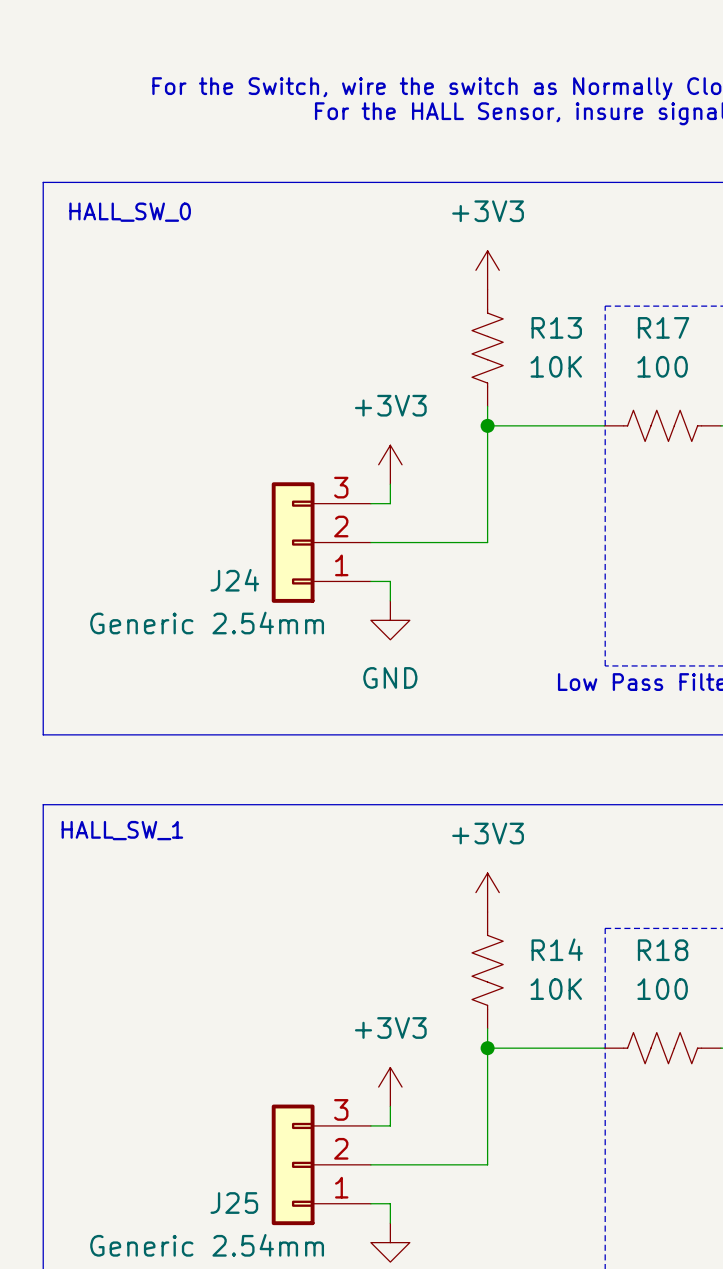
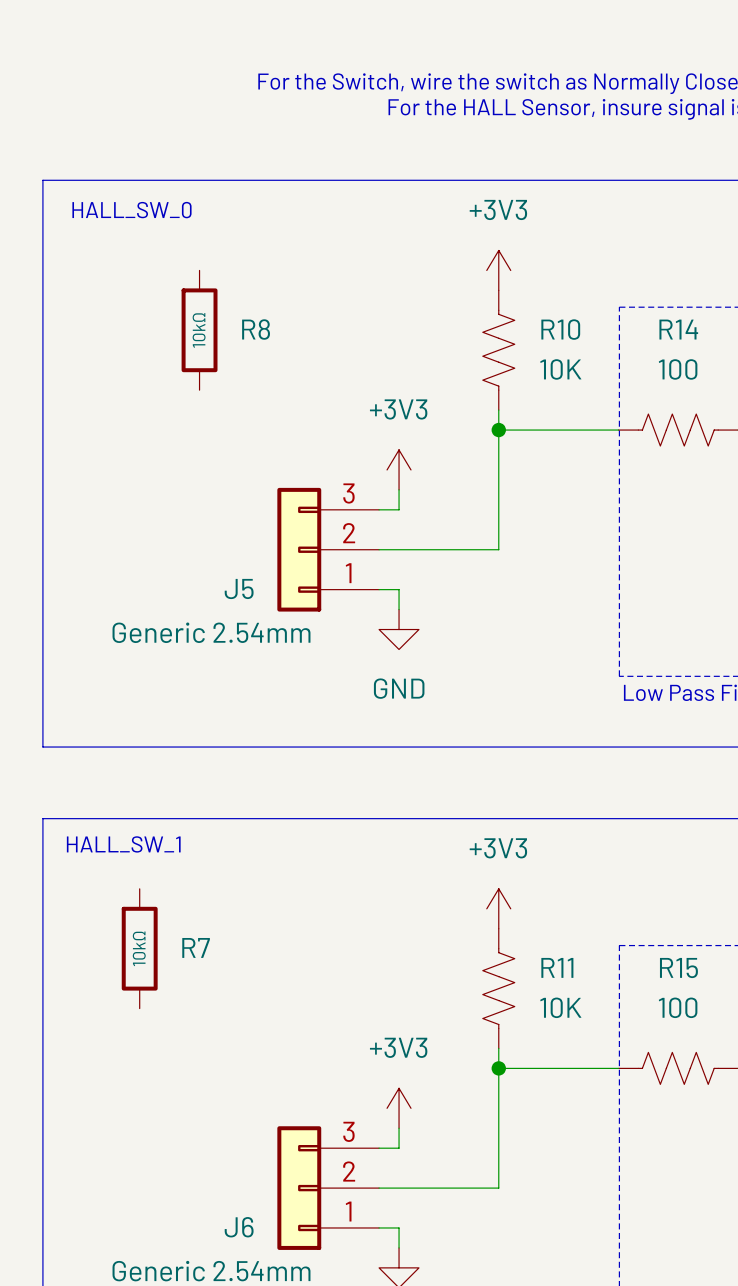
R13 name: R13 (556, 327) -> R10 (560, 329)
R17 name: R17 (663, 327) -> R14 (678, 329)
R8: none -> 10kΩ (199, 330)
J24 name: J24 (234, 580) -> J5 (239, 588)
R7: none -> 10kΩ (139, 948)
R14 name: R14 (557, 949) -> R11 (557, 967)
R18 name: R18 (663, 950) -> R15 (678, 968)
J25 name: J25 (234, 1203) -> J6 (239, 1227)

